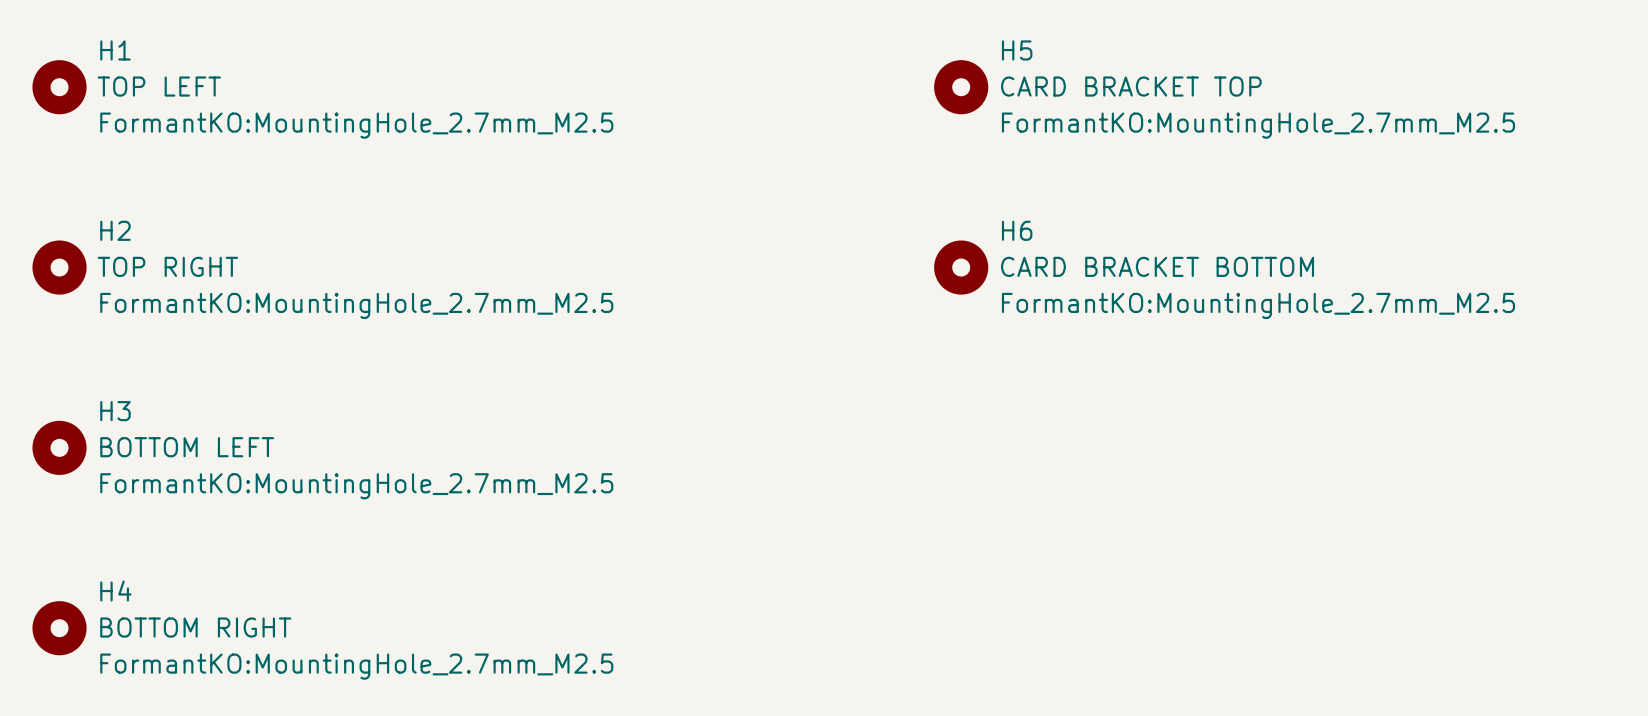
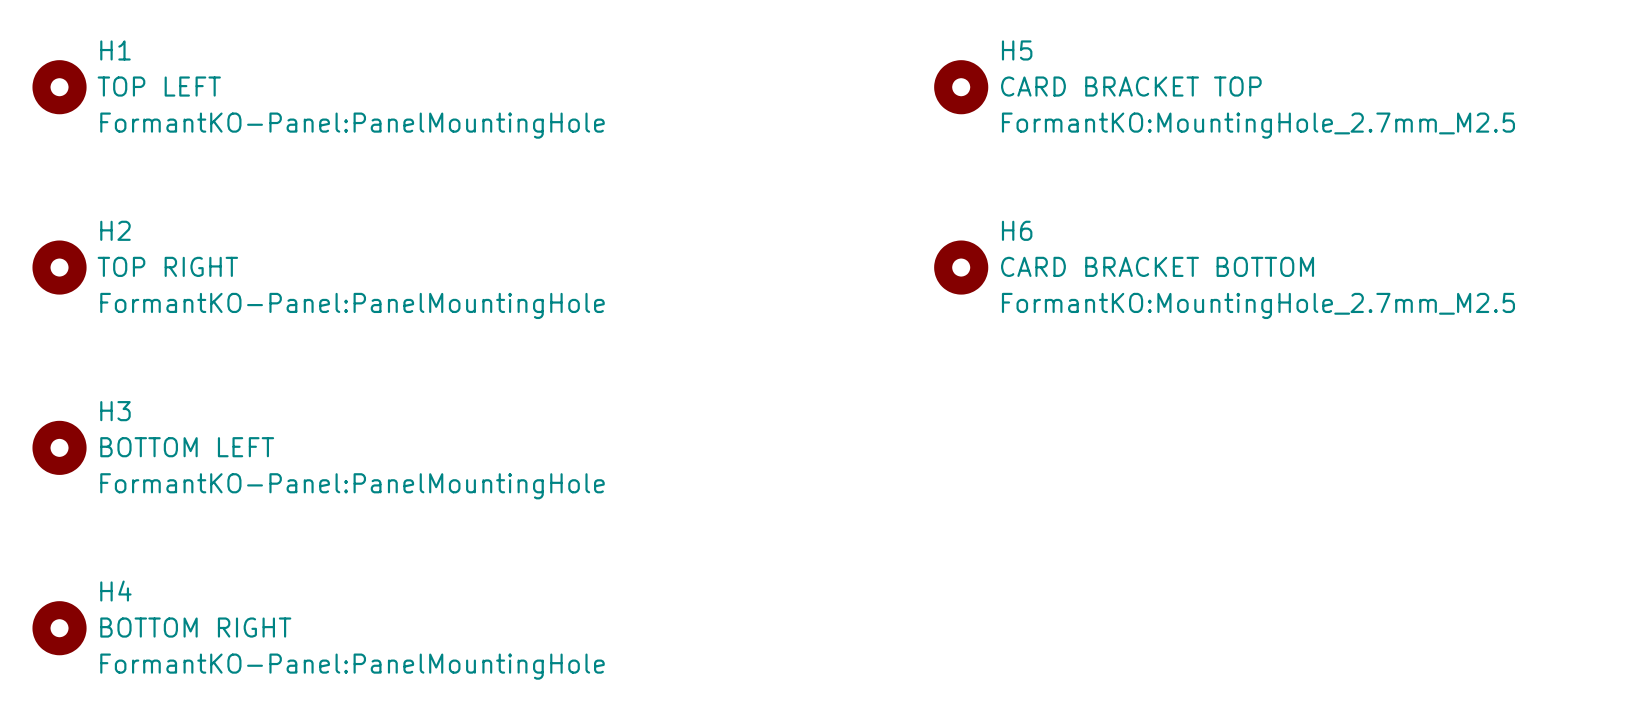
H1 text: FormantKO:MountingHole_2.7mm_M2.5 (356, 125) -> FormantKO-Panel:PanelMountingHole (352, 125)
H2 text: FormantKO:MountingHole_2.7mm_M2.5 (356, 305) -> FormantKO-Panel:PanelMountingHole (352, 305)
H3 text: FormantKO:MountingHole_2.7mm_M2.5 (356, 486) -> FormantKO-Panel:PanelMountingHole (352, 486)
H4 text: FormantKO:MountingHole_2.7mm_M2.5 (356, 666) -> FormantKO-Panel:PanelMountingHole (352, 666)

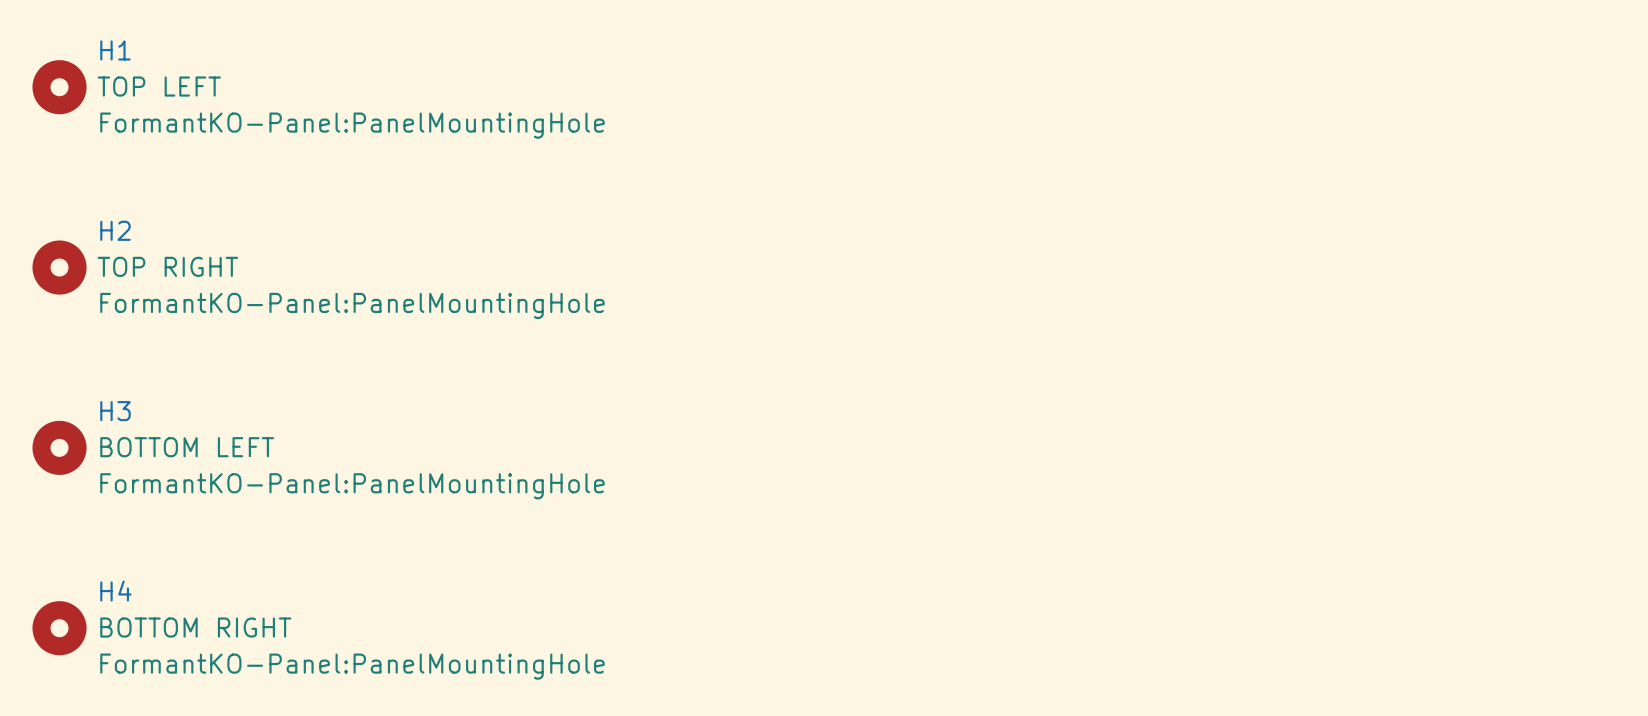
H5: CARD BRACKET TOP (961, 87) -> none
H6: CARD BRACKET BOTTOM (961, 267) -> none

